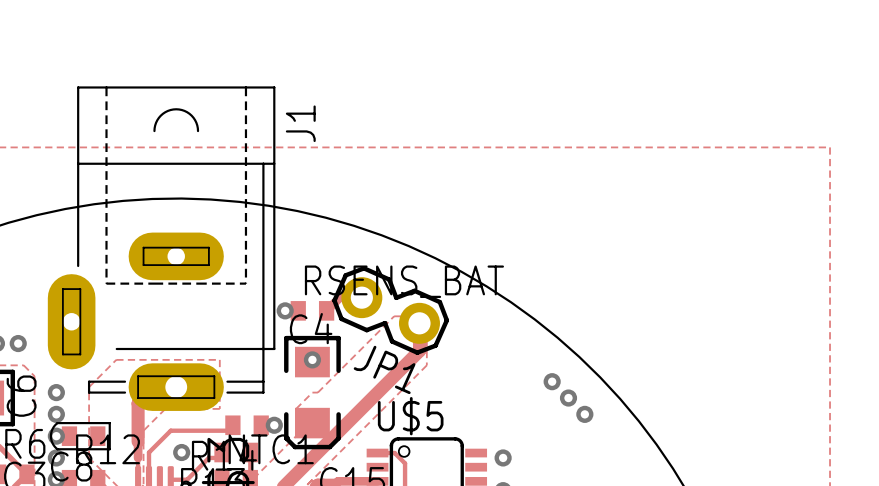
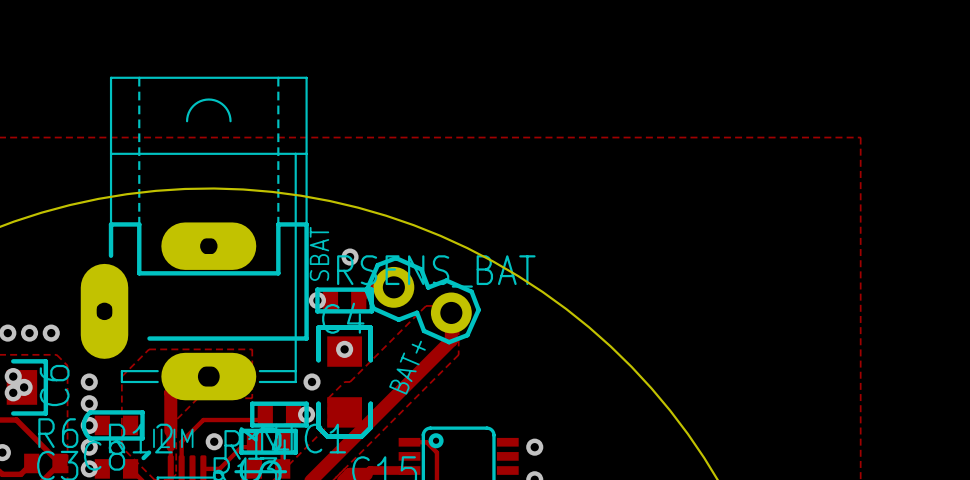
J1 name: J1 (300, 123) -> none
text: none -> SBAT (319, 253)
line: none -> (111, 255) (111, 224) (139, 224) (139, 273) (278, 273) (278, 224) (306, 224) (306, 338) (149, 338)
via: none -> (350, 257)
line: none -> (317, 289) (317, 311) (371, 311) (371, 289) (317, 289)
JP1 name: JP1 (384, 369) -> none
line: none -> (318, 360) (318, 327) (370, 327) (370, 360)
text: none -> BAT+ (407, 367)
via: (552, 381) -> none
via: none -> (312, 381)
via: (568, 398) -> none
line: none -> (252, 403) (252, 425) (306, 425) (306, 403) (252, 403)
line: none -> (318, 403) (318, 427) (327, 436) (361, 436) (370, 427) (370, 403)
via: (584, 414) -> none
U$5 name: U$5 (410, 416) -> none
line: none -> (90, 412) (142, 412) (142, 438) (90, 438) (85, 432) (83, 425) (85, 418) (90, 412)
line: none -> (241, 430) (241, 452) (295, 452) (295, 430) (241, 430)
drawing: none -> [428, 433, 444, 449]
text: none -> ILIM (173, 438)
line: none -> (149, 452) (143, 458)

